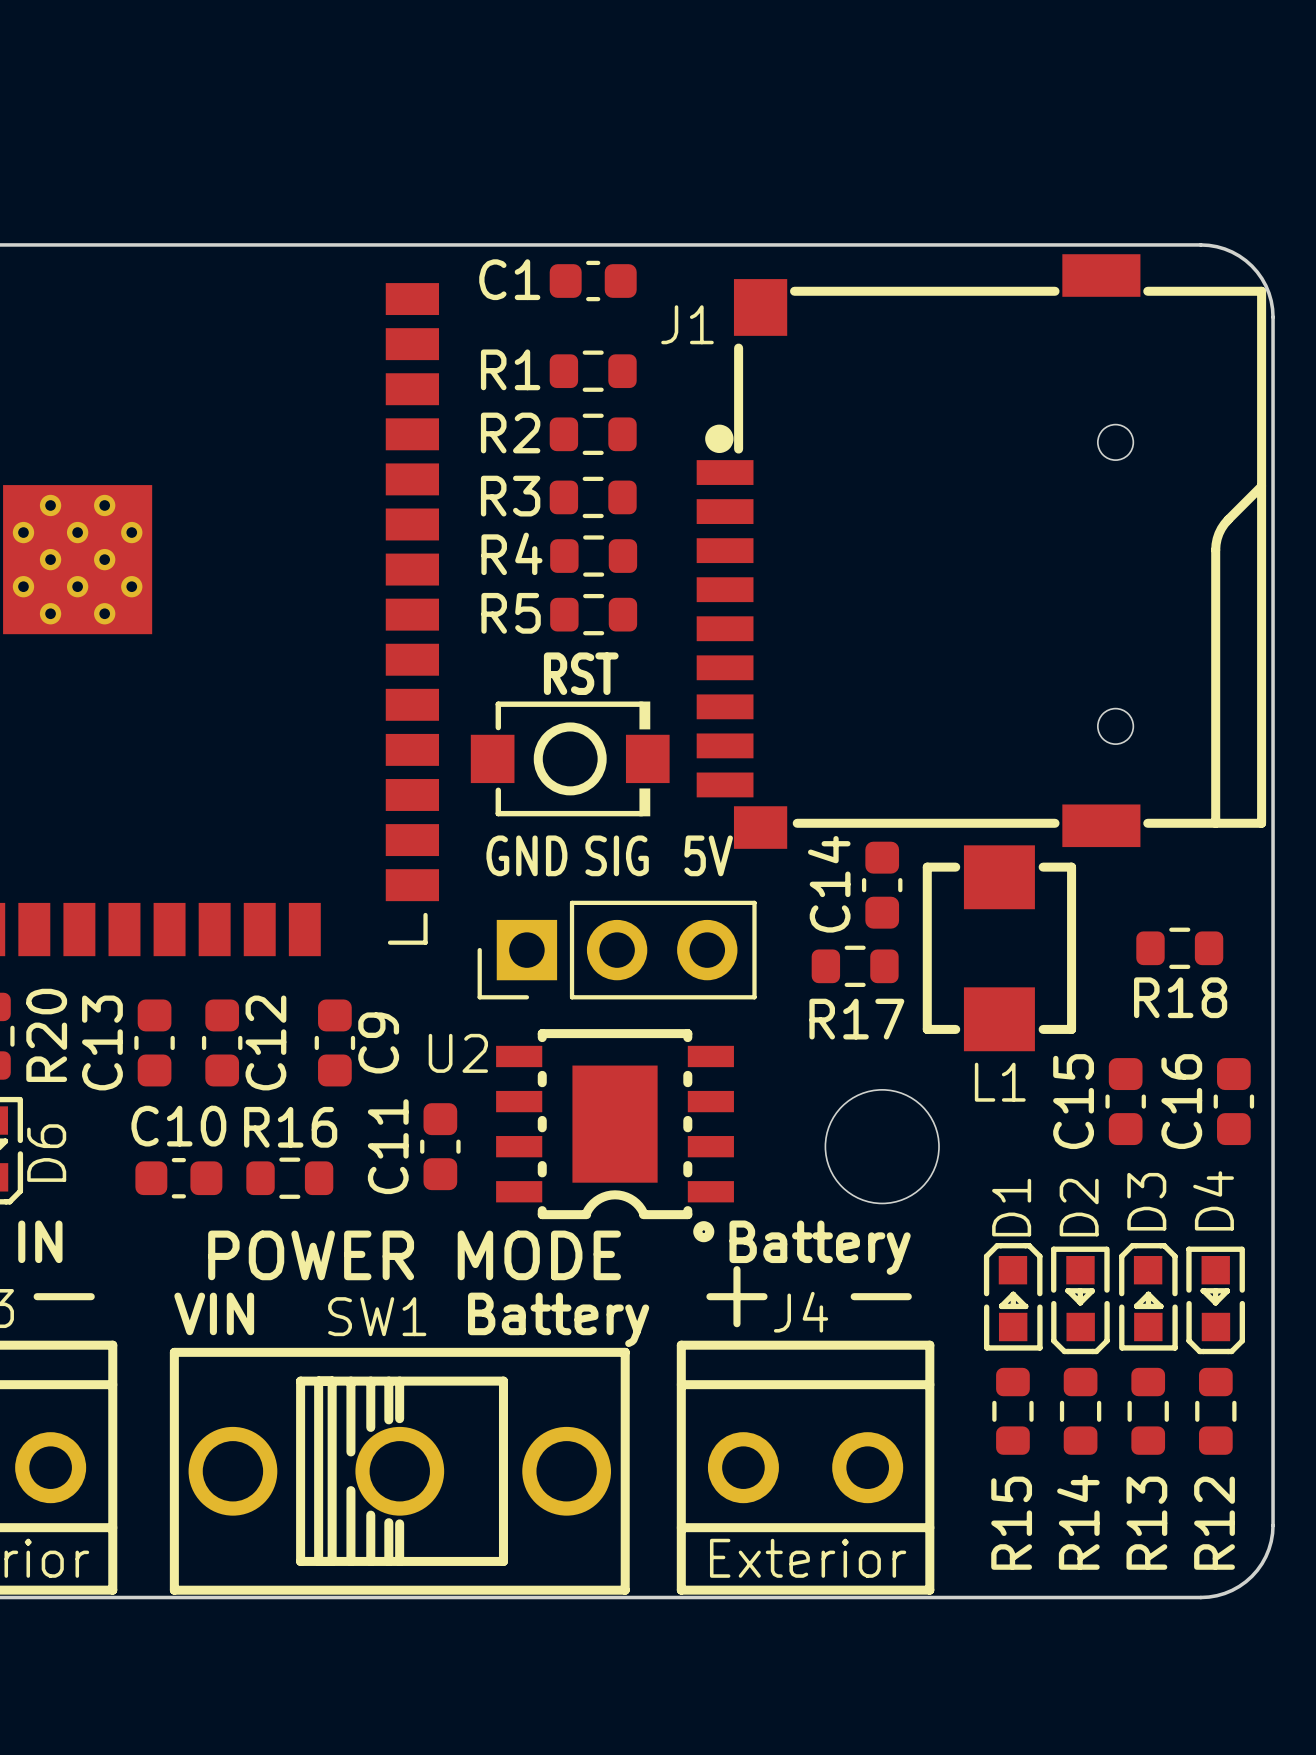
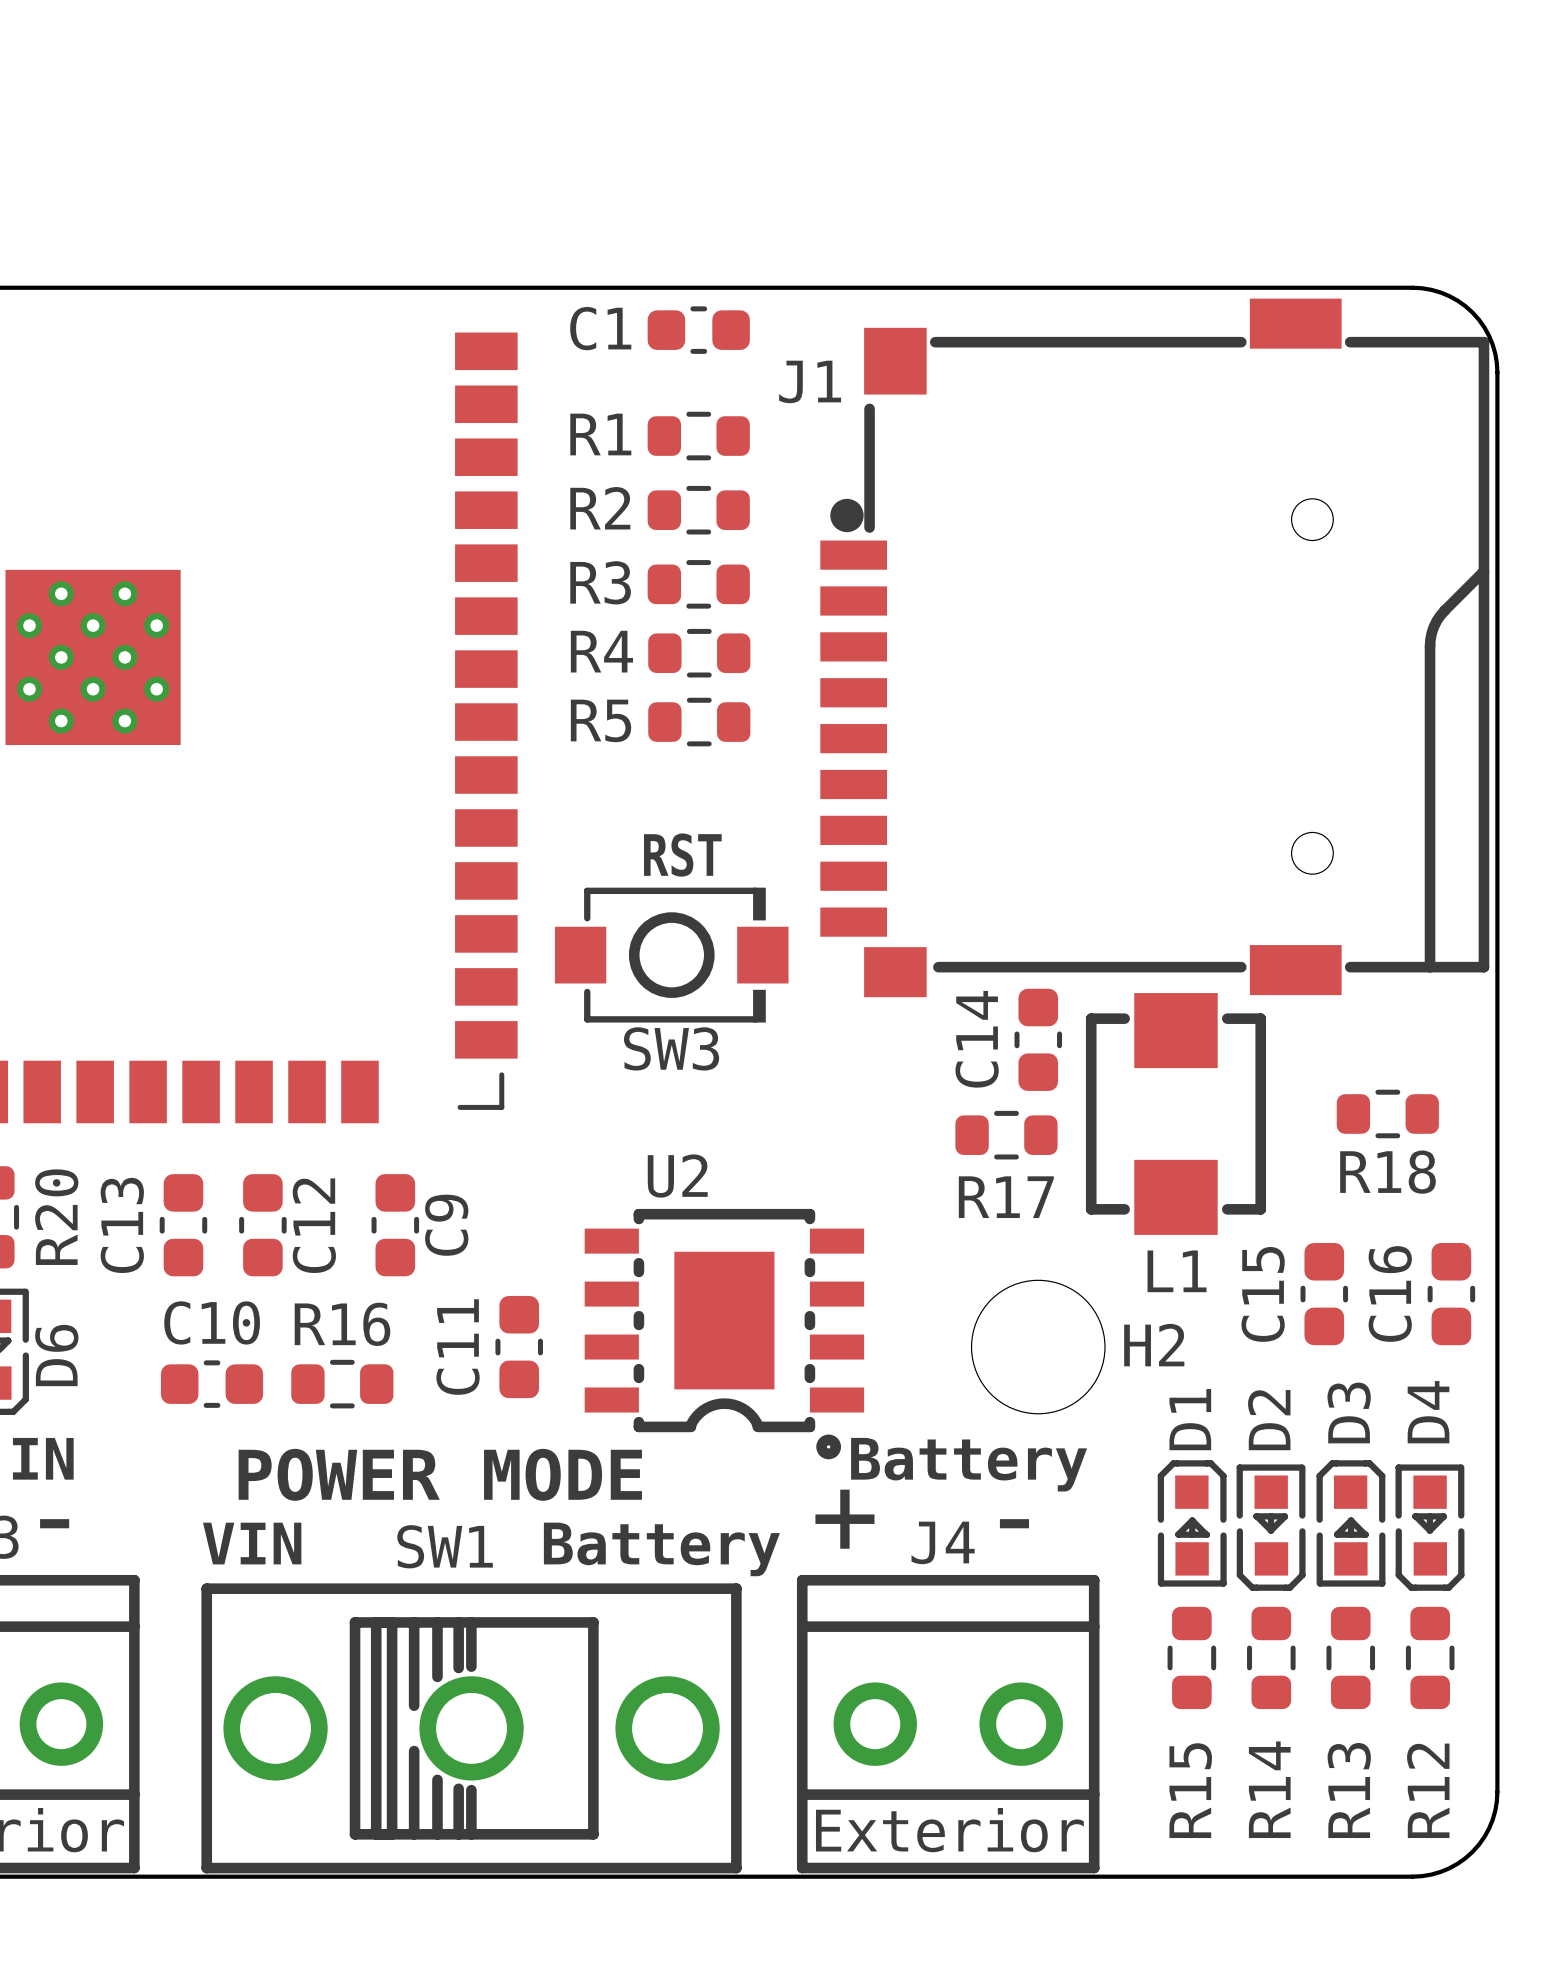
text position: RST (581, 673) -> RST (682, 855)
part: (570, 758) -> none
SW3: none -> (671, 955)
part: (617, 950) -> none
U2 name position: U2 (458, 1053) -> U2 (677, 1176)
H2 name: none -> H2 (1154, 1345)

